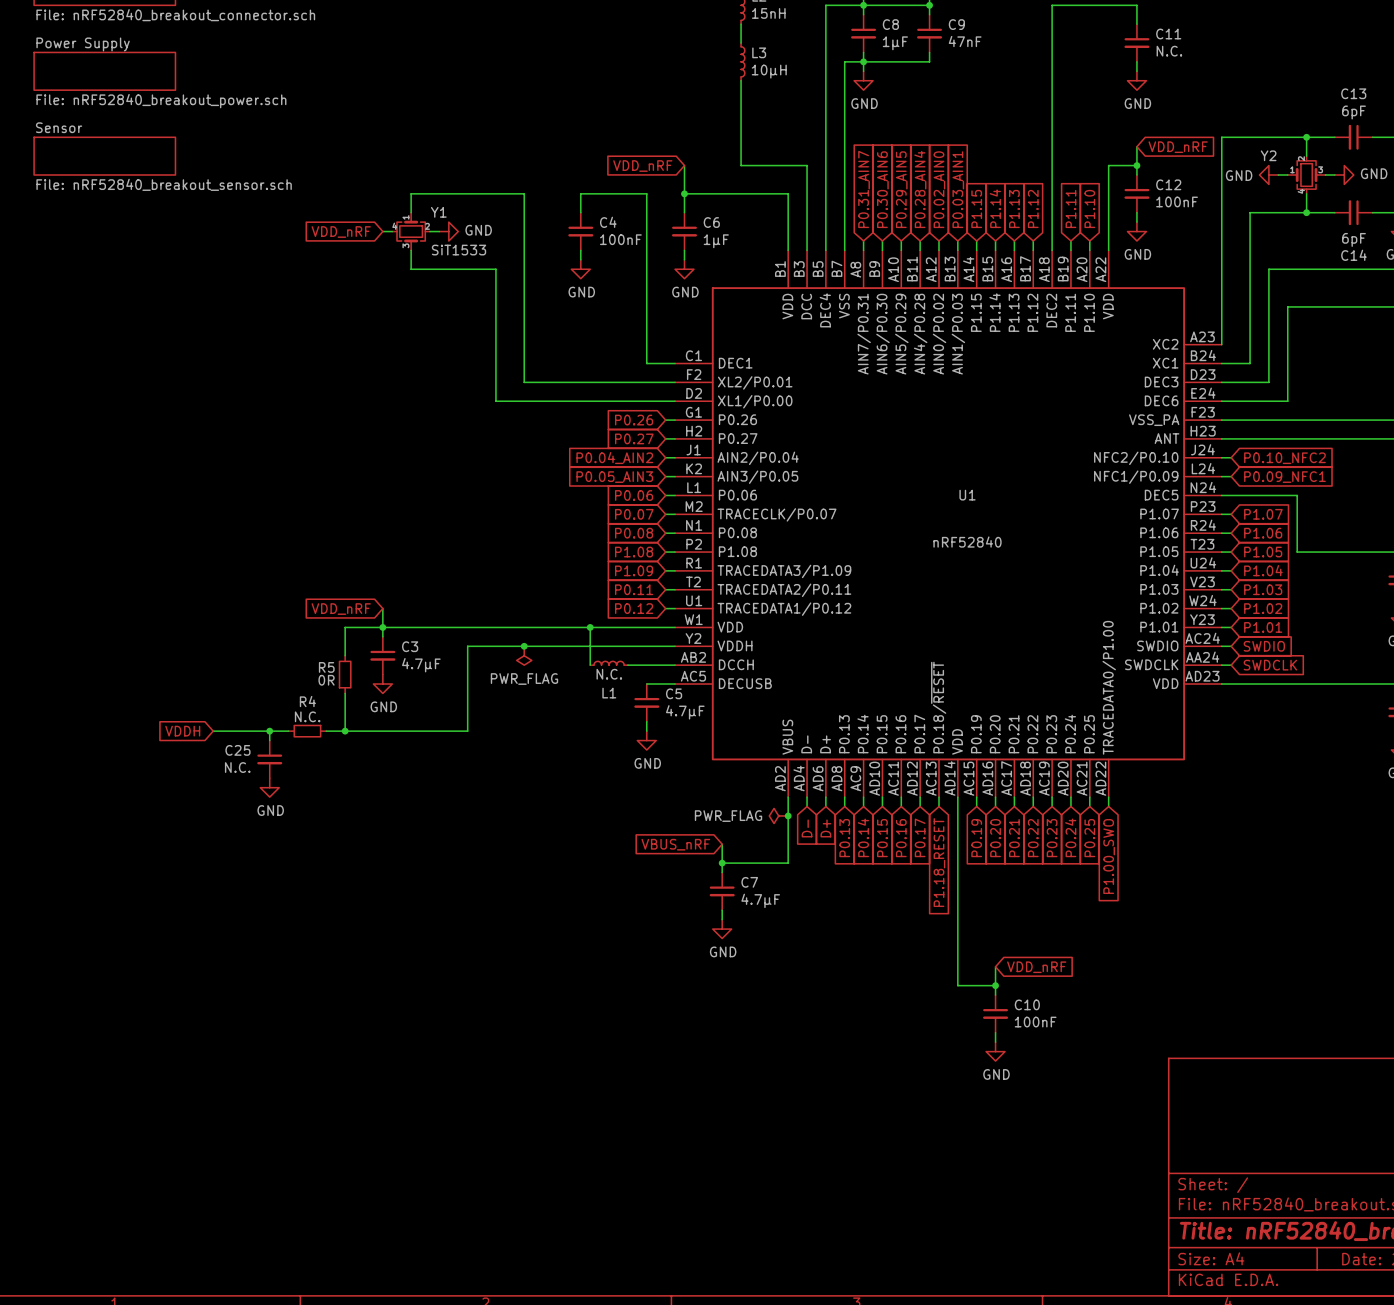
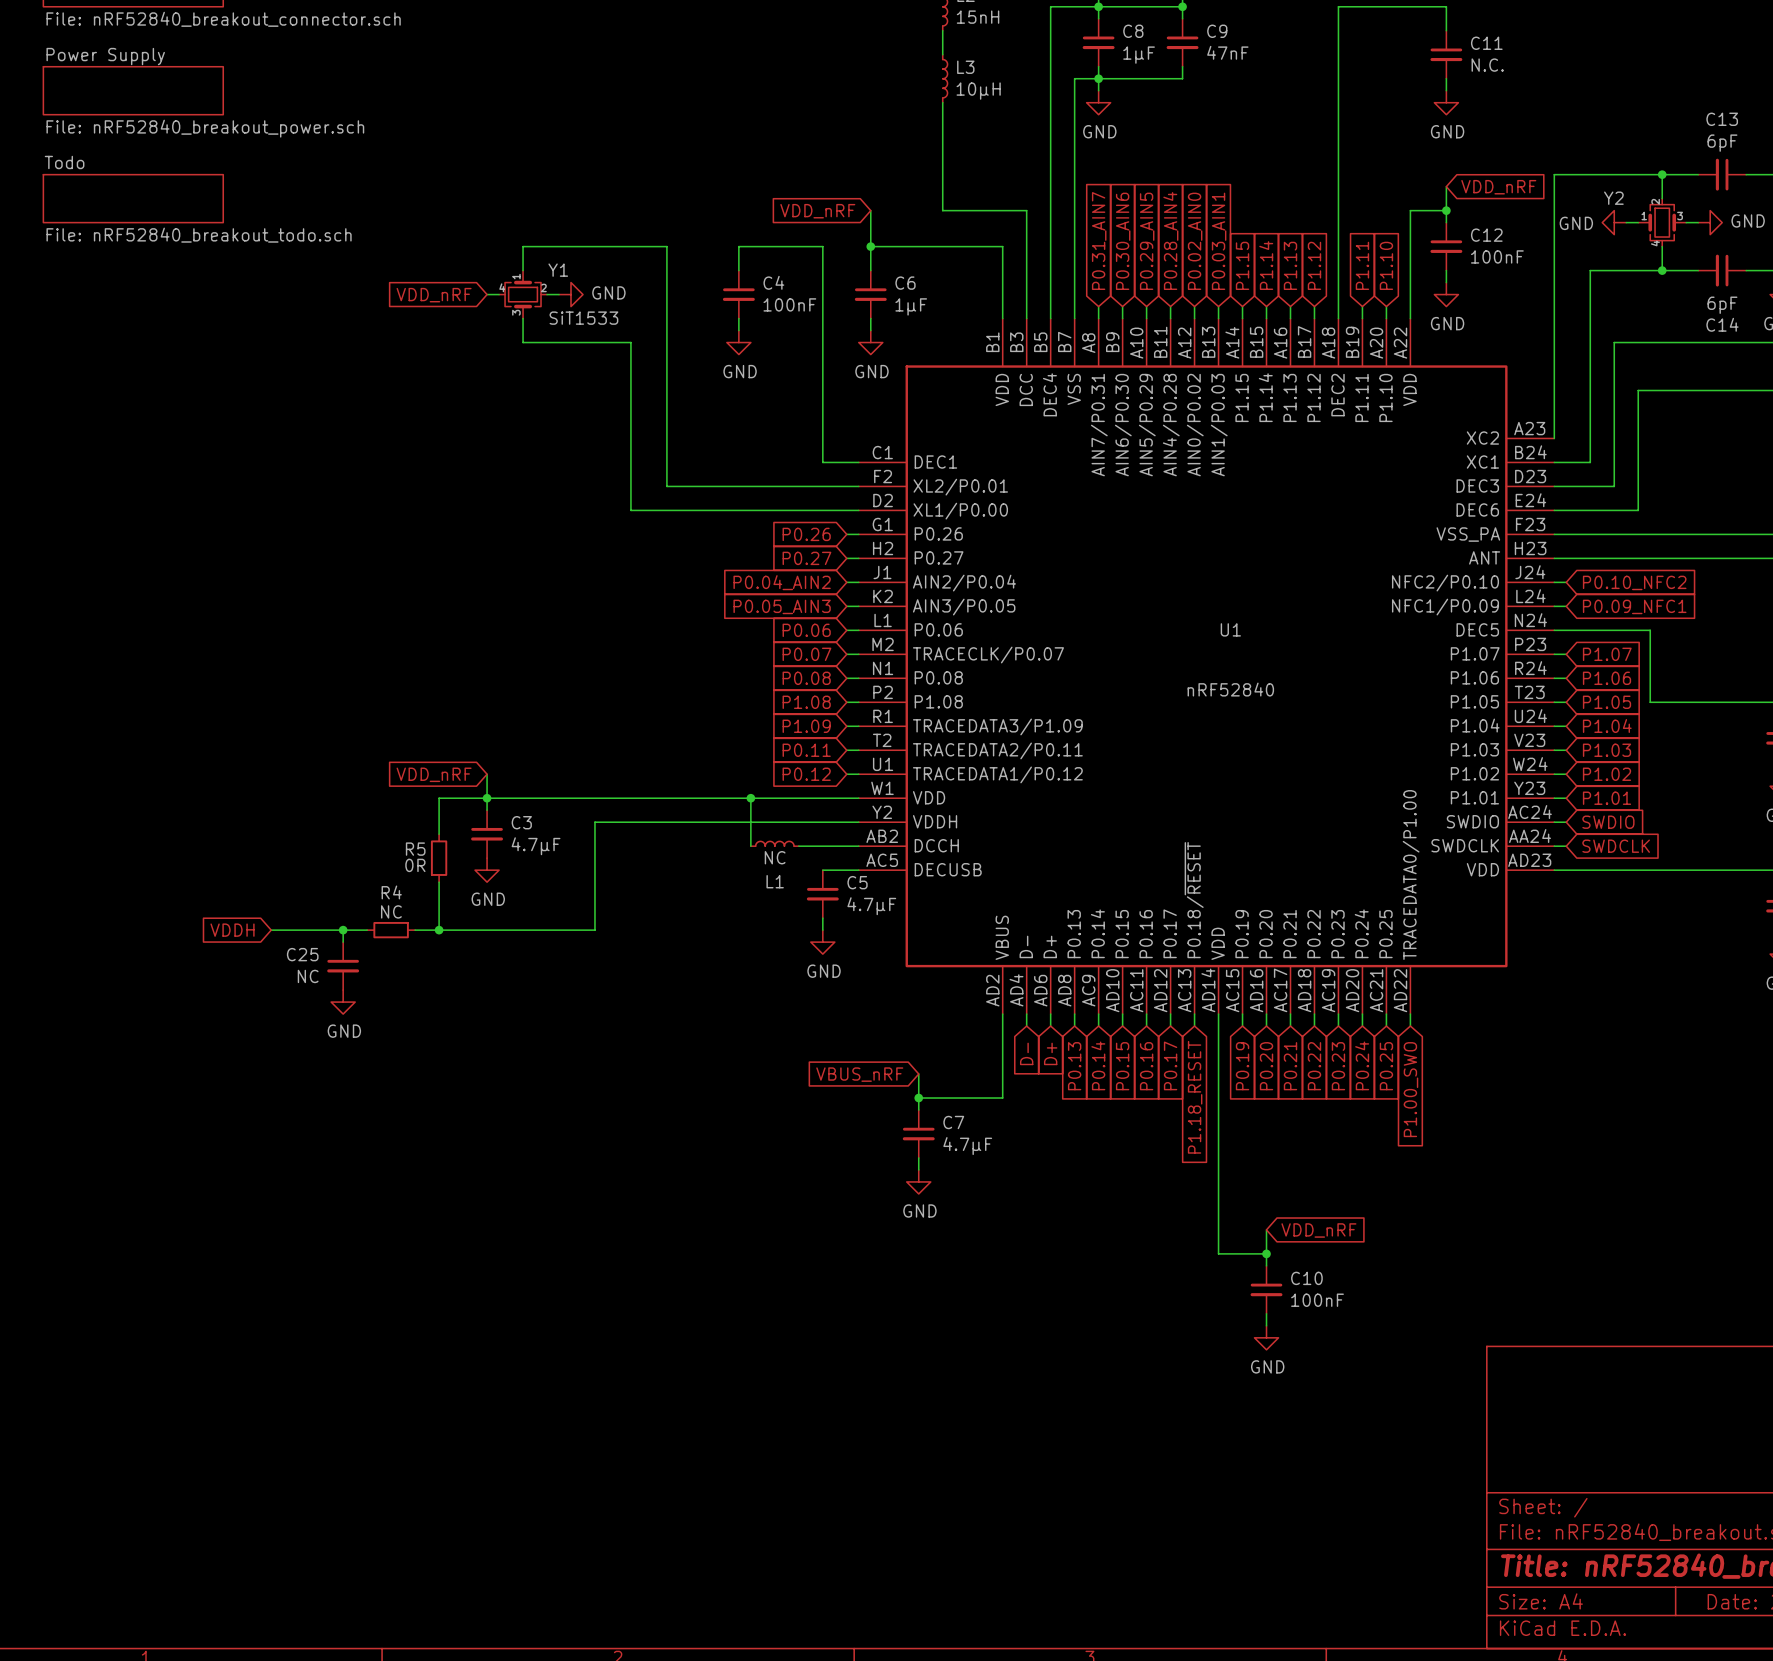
sheet Sensor name: Sensor (59, 127) -> Todo (64, 162)
sheet Sensor value: File: nRF52840_breakout_sensor.sch (164, 184) -> File: nRF52840_breakout_todo.sch (199, 235)
junction: (524, 646) -> none
power symbol: PWR_FLAG (524, 655) -> none
L1 value: N.C. (609, 674) -> NC (775, 857)
R4 value: N.C. (307, 716) -> NC (391, 911)
C25 value: N.C. (237, 767) -> NC (308, 976)
power symbol: PWR_FLAG (778, 815) -> none
junction: (788, 815) -> none

